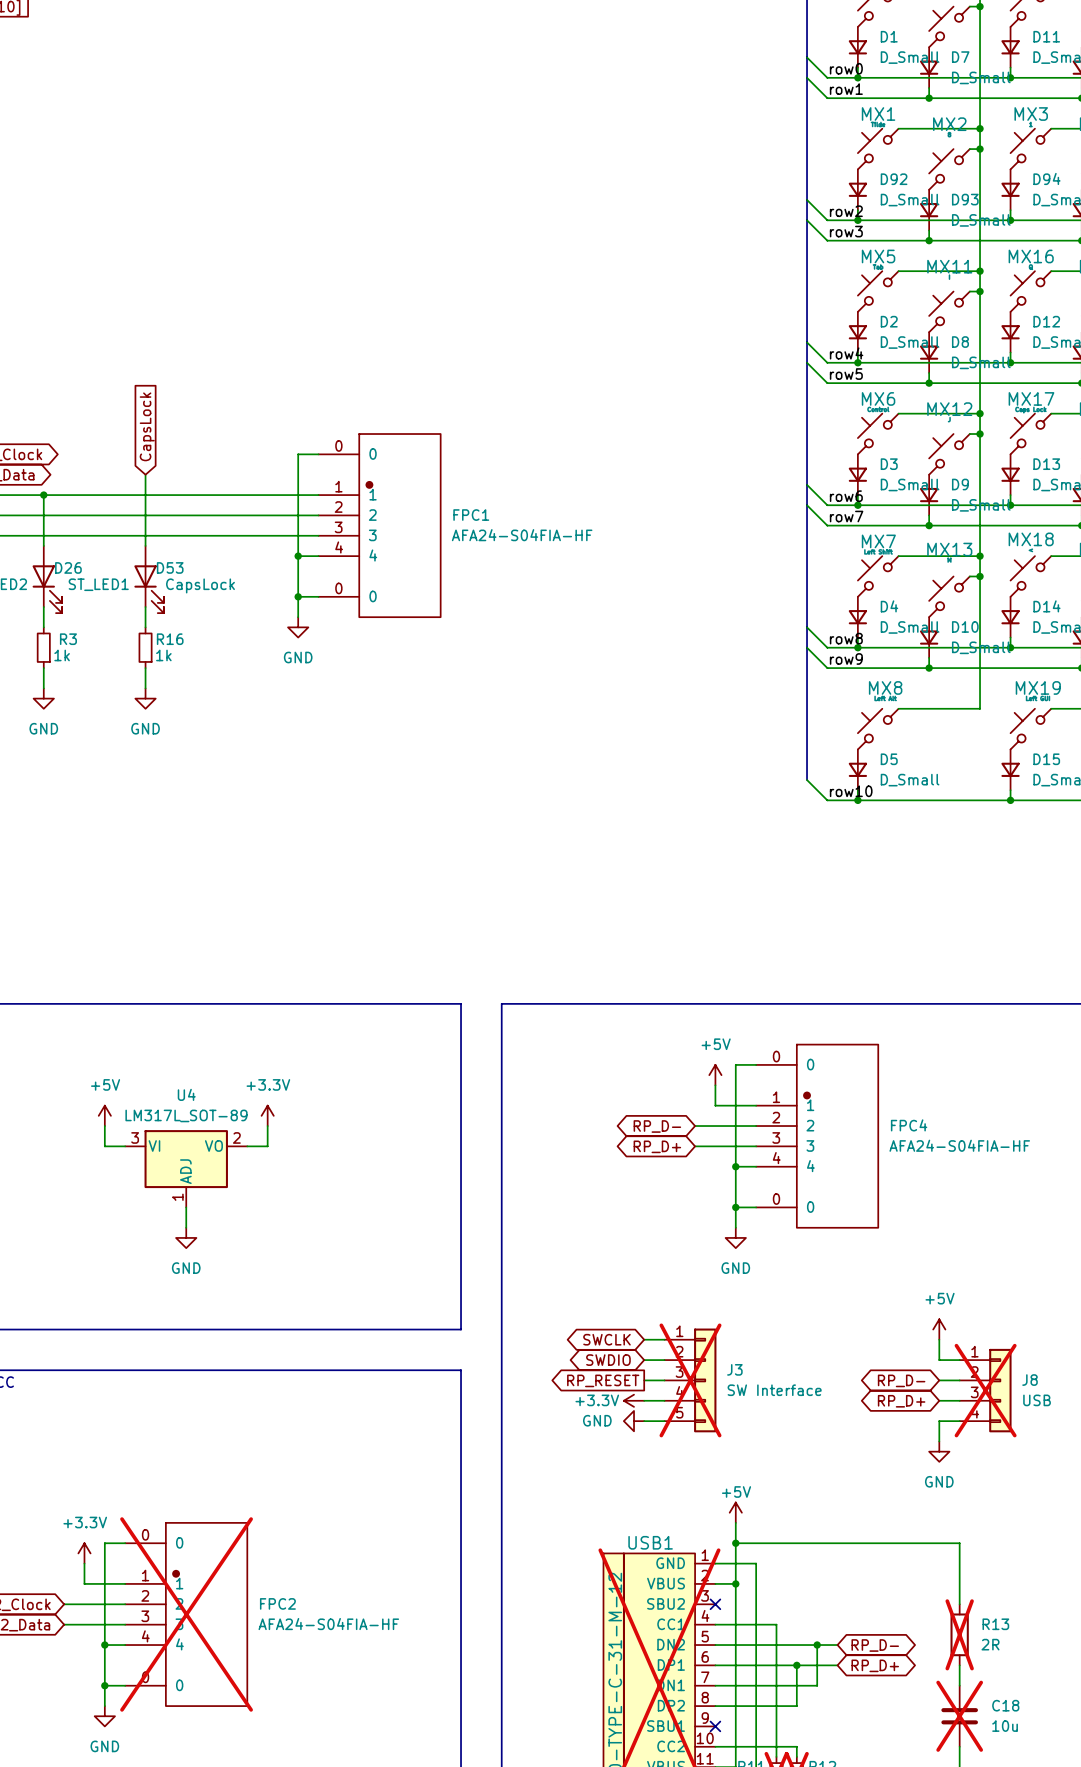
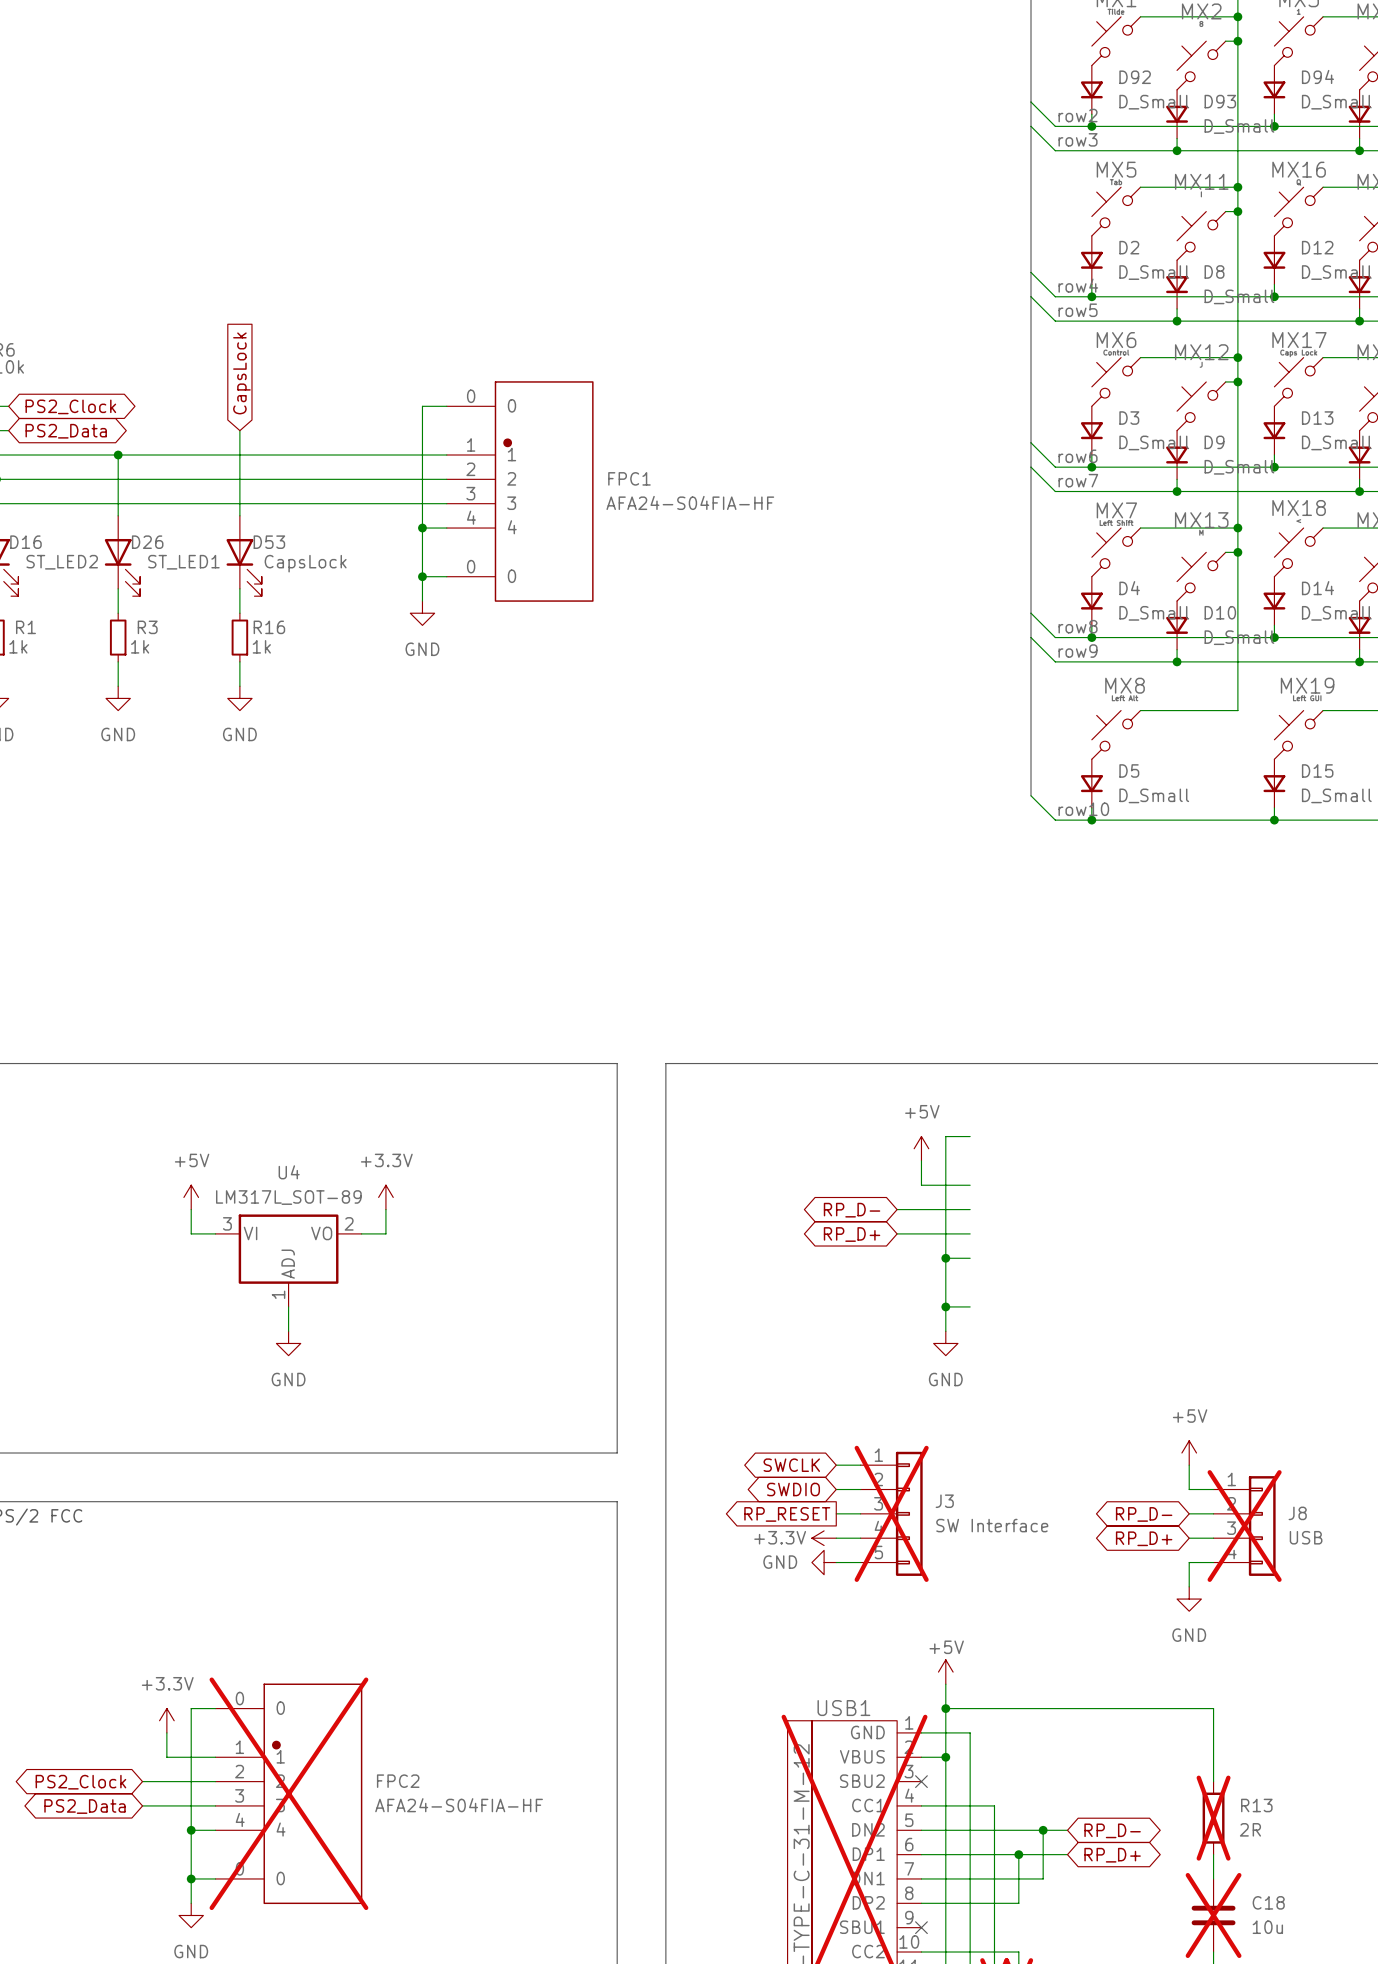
FPC4: AFA24-S04FIA-HF (817, 1136) -> none

